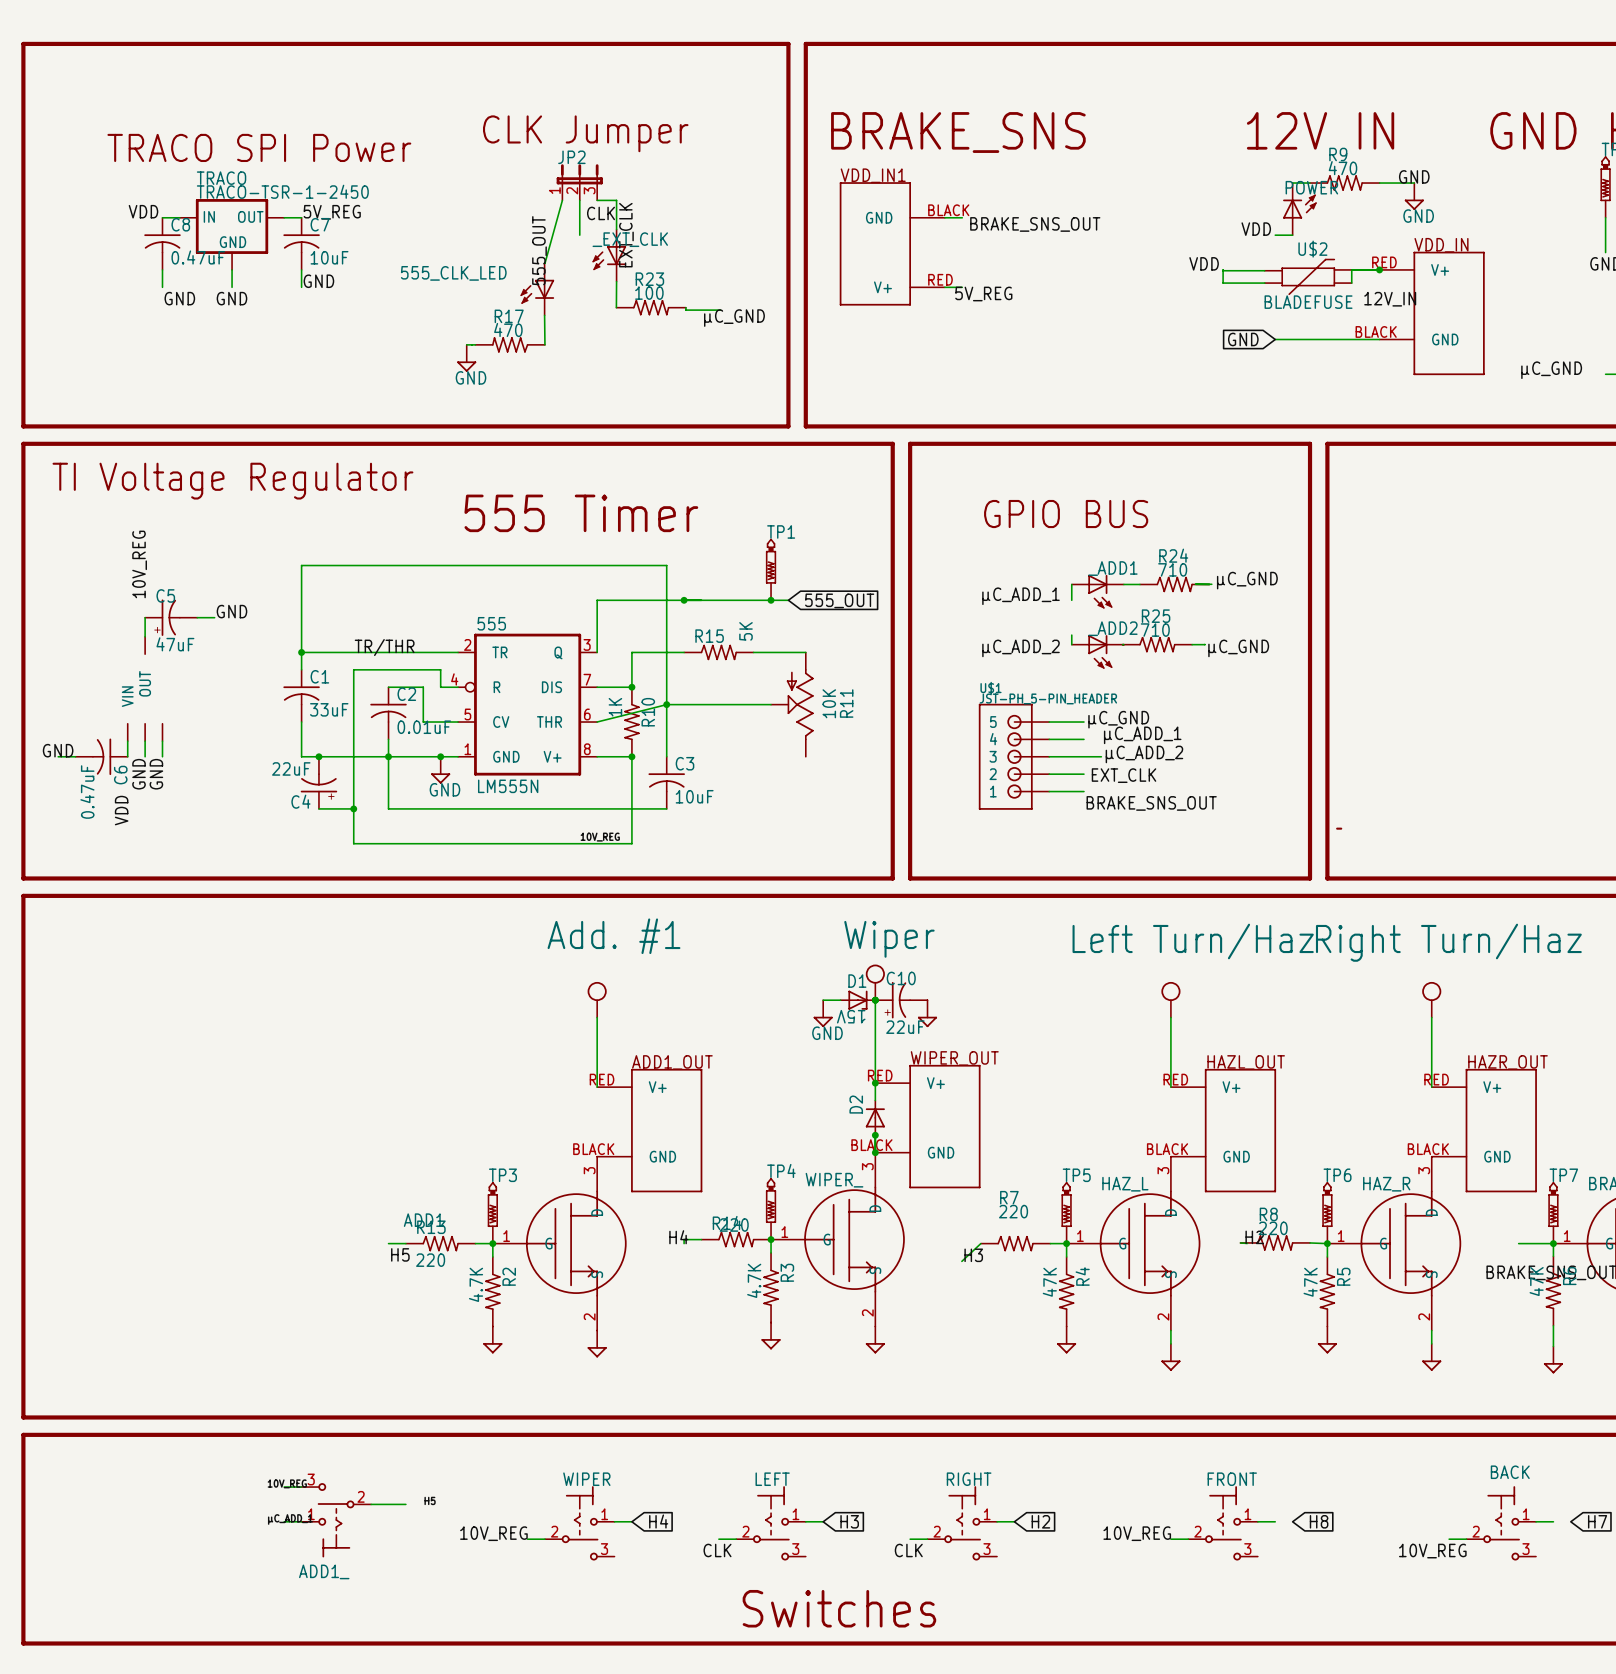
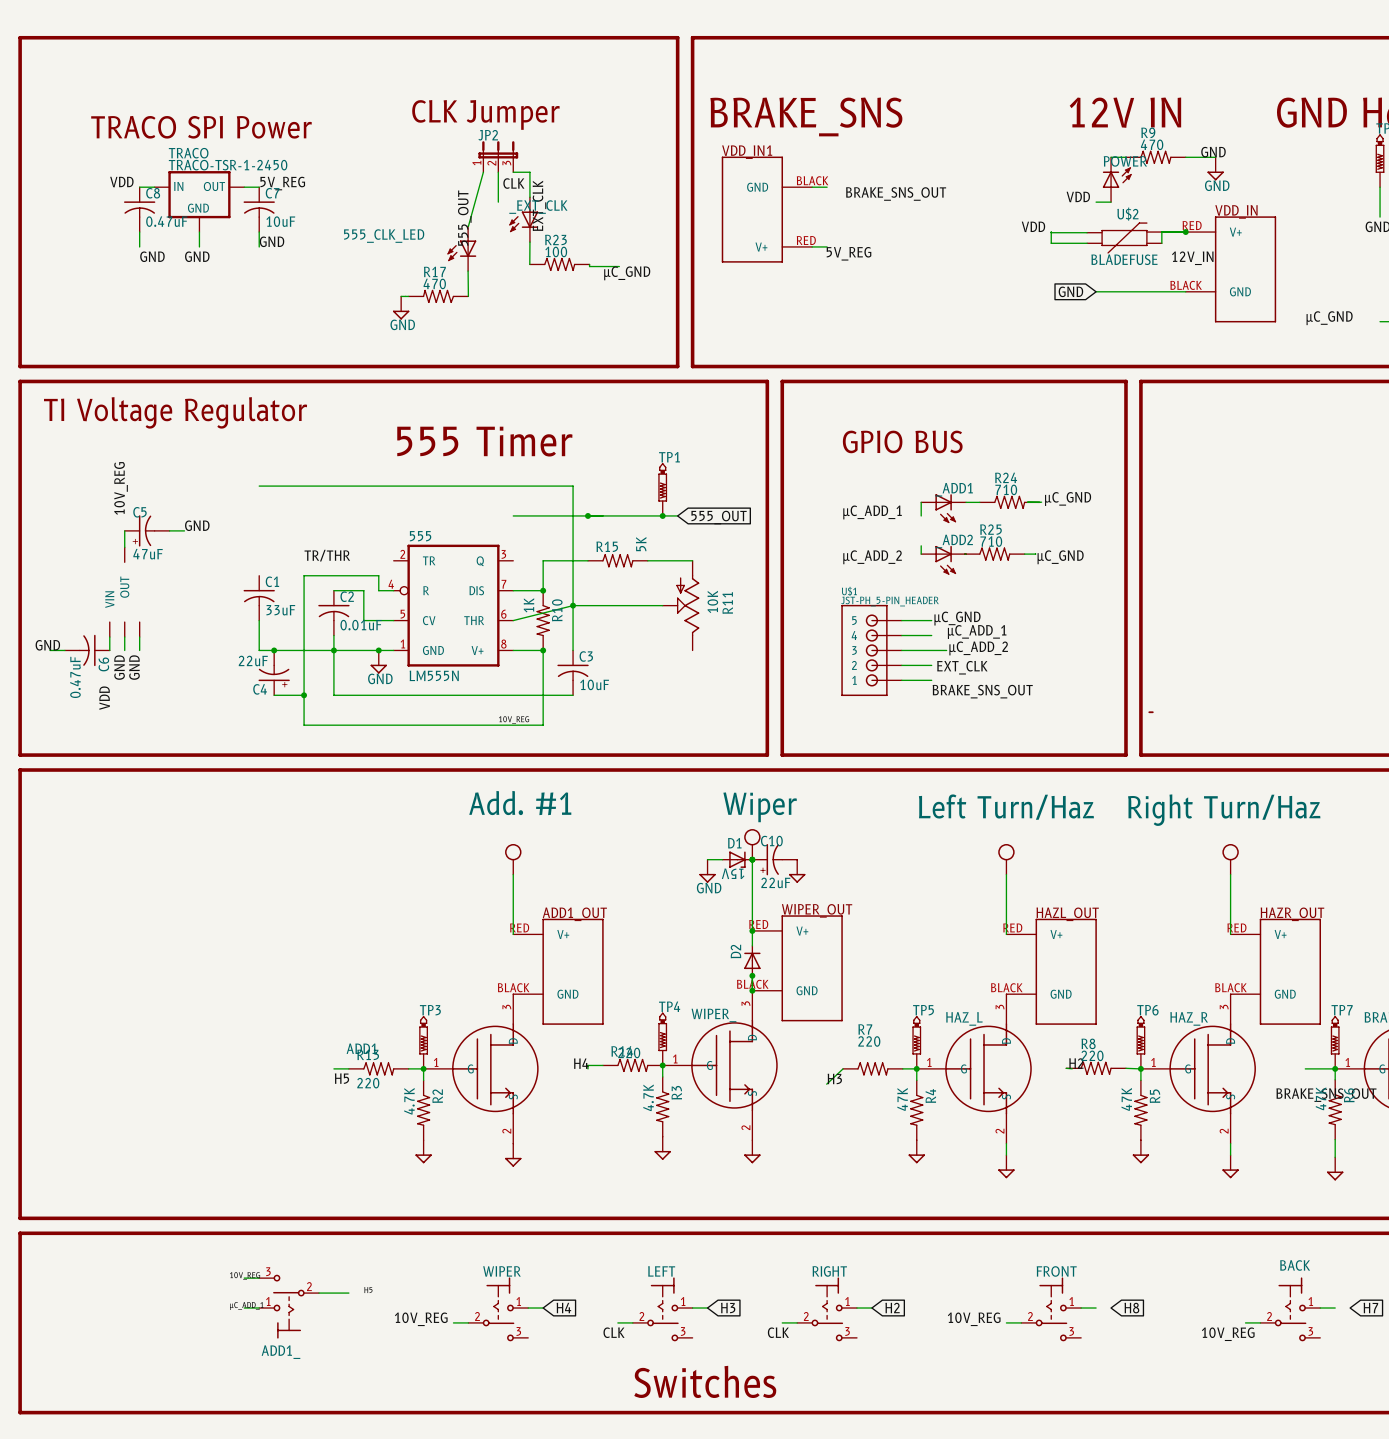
wire: (301, 565) (301, 669) -> none
wire: (597, 600) (597, 652) -> none
wire: (301, 652) (458, 652) -> none
junction: (301, 652) -> none

